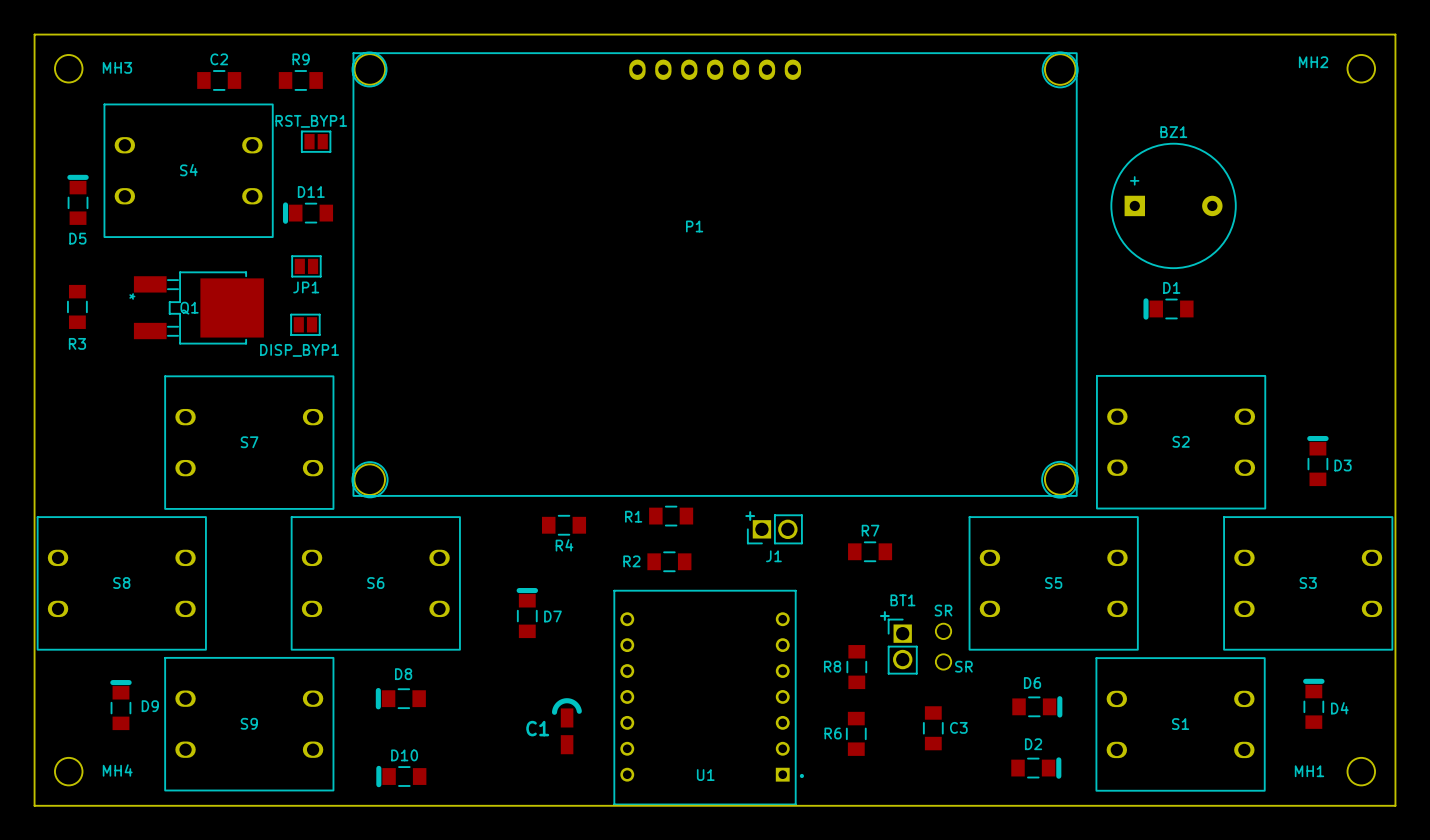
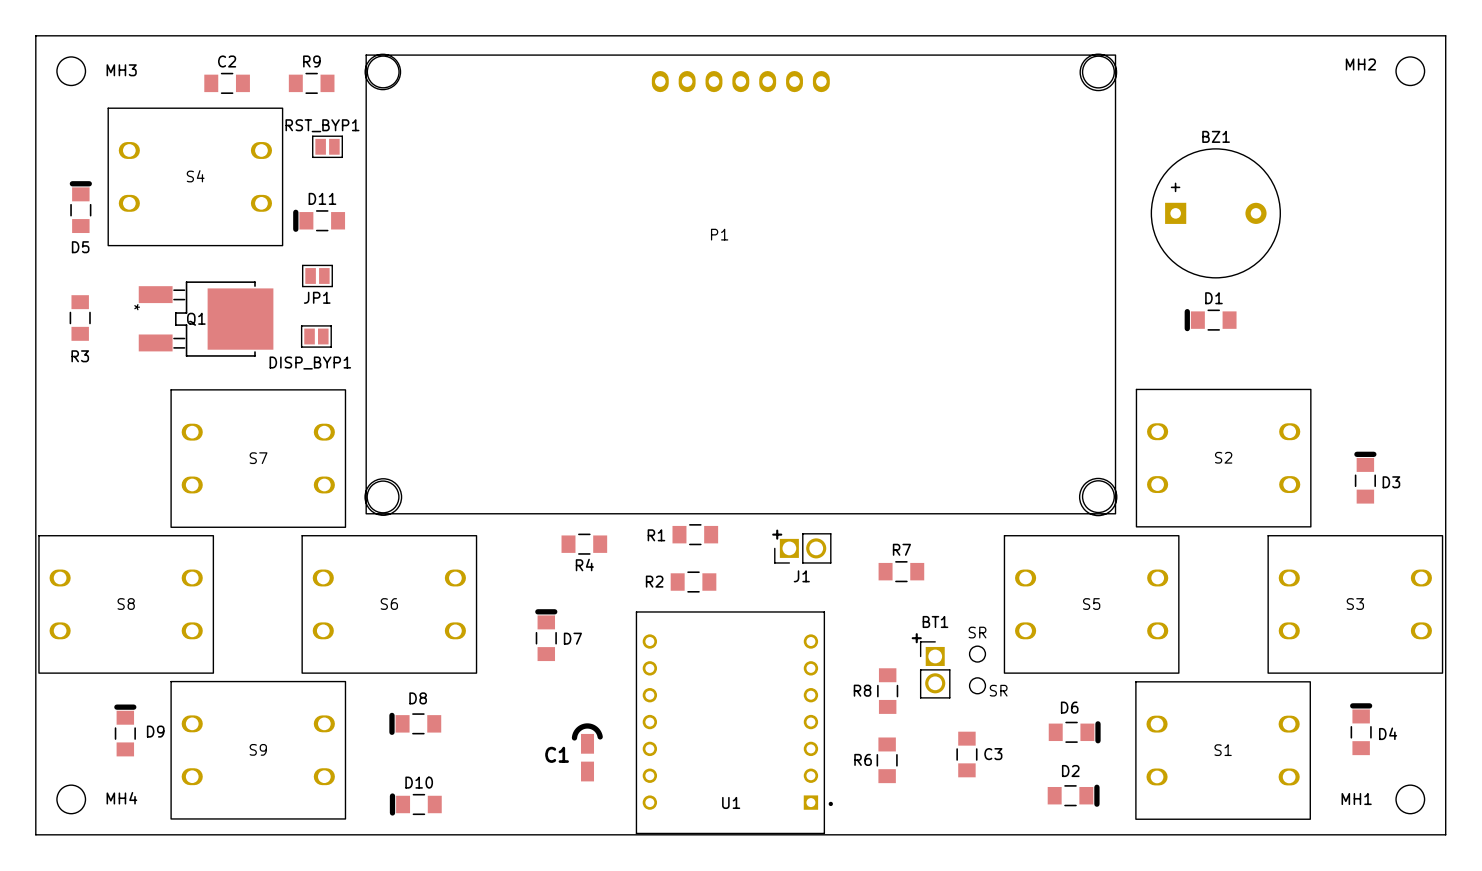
P1 footprint: [351, 51, 1079, 499] -> [364, 53, 1118, 517]

